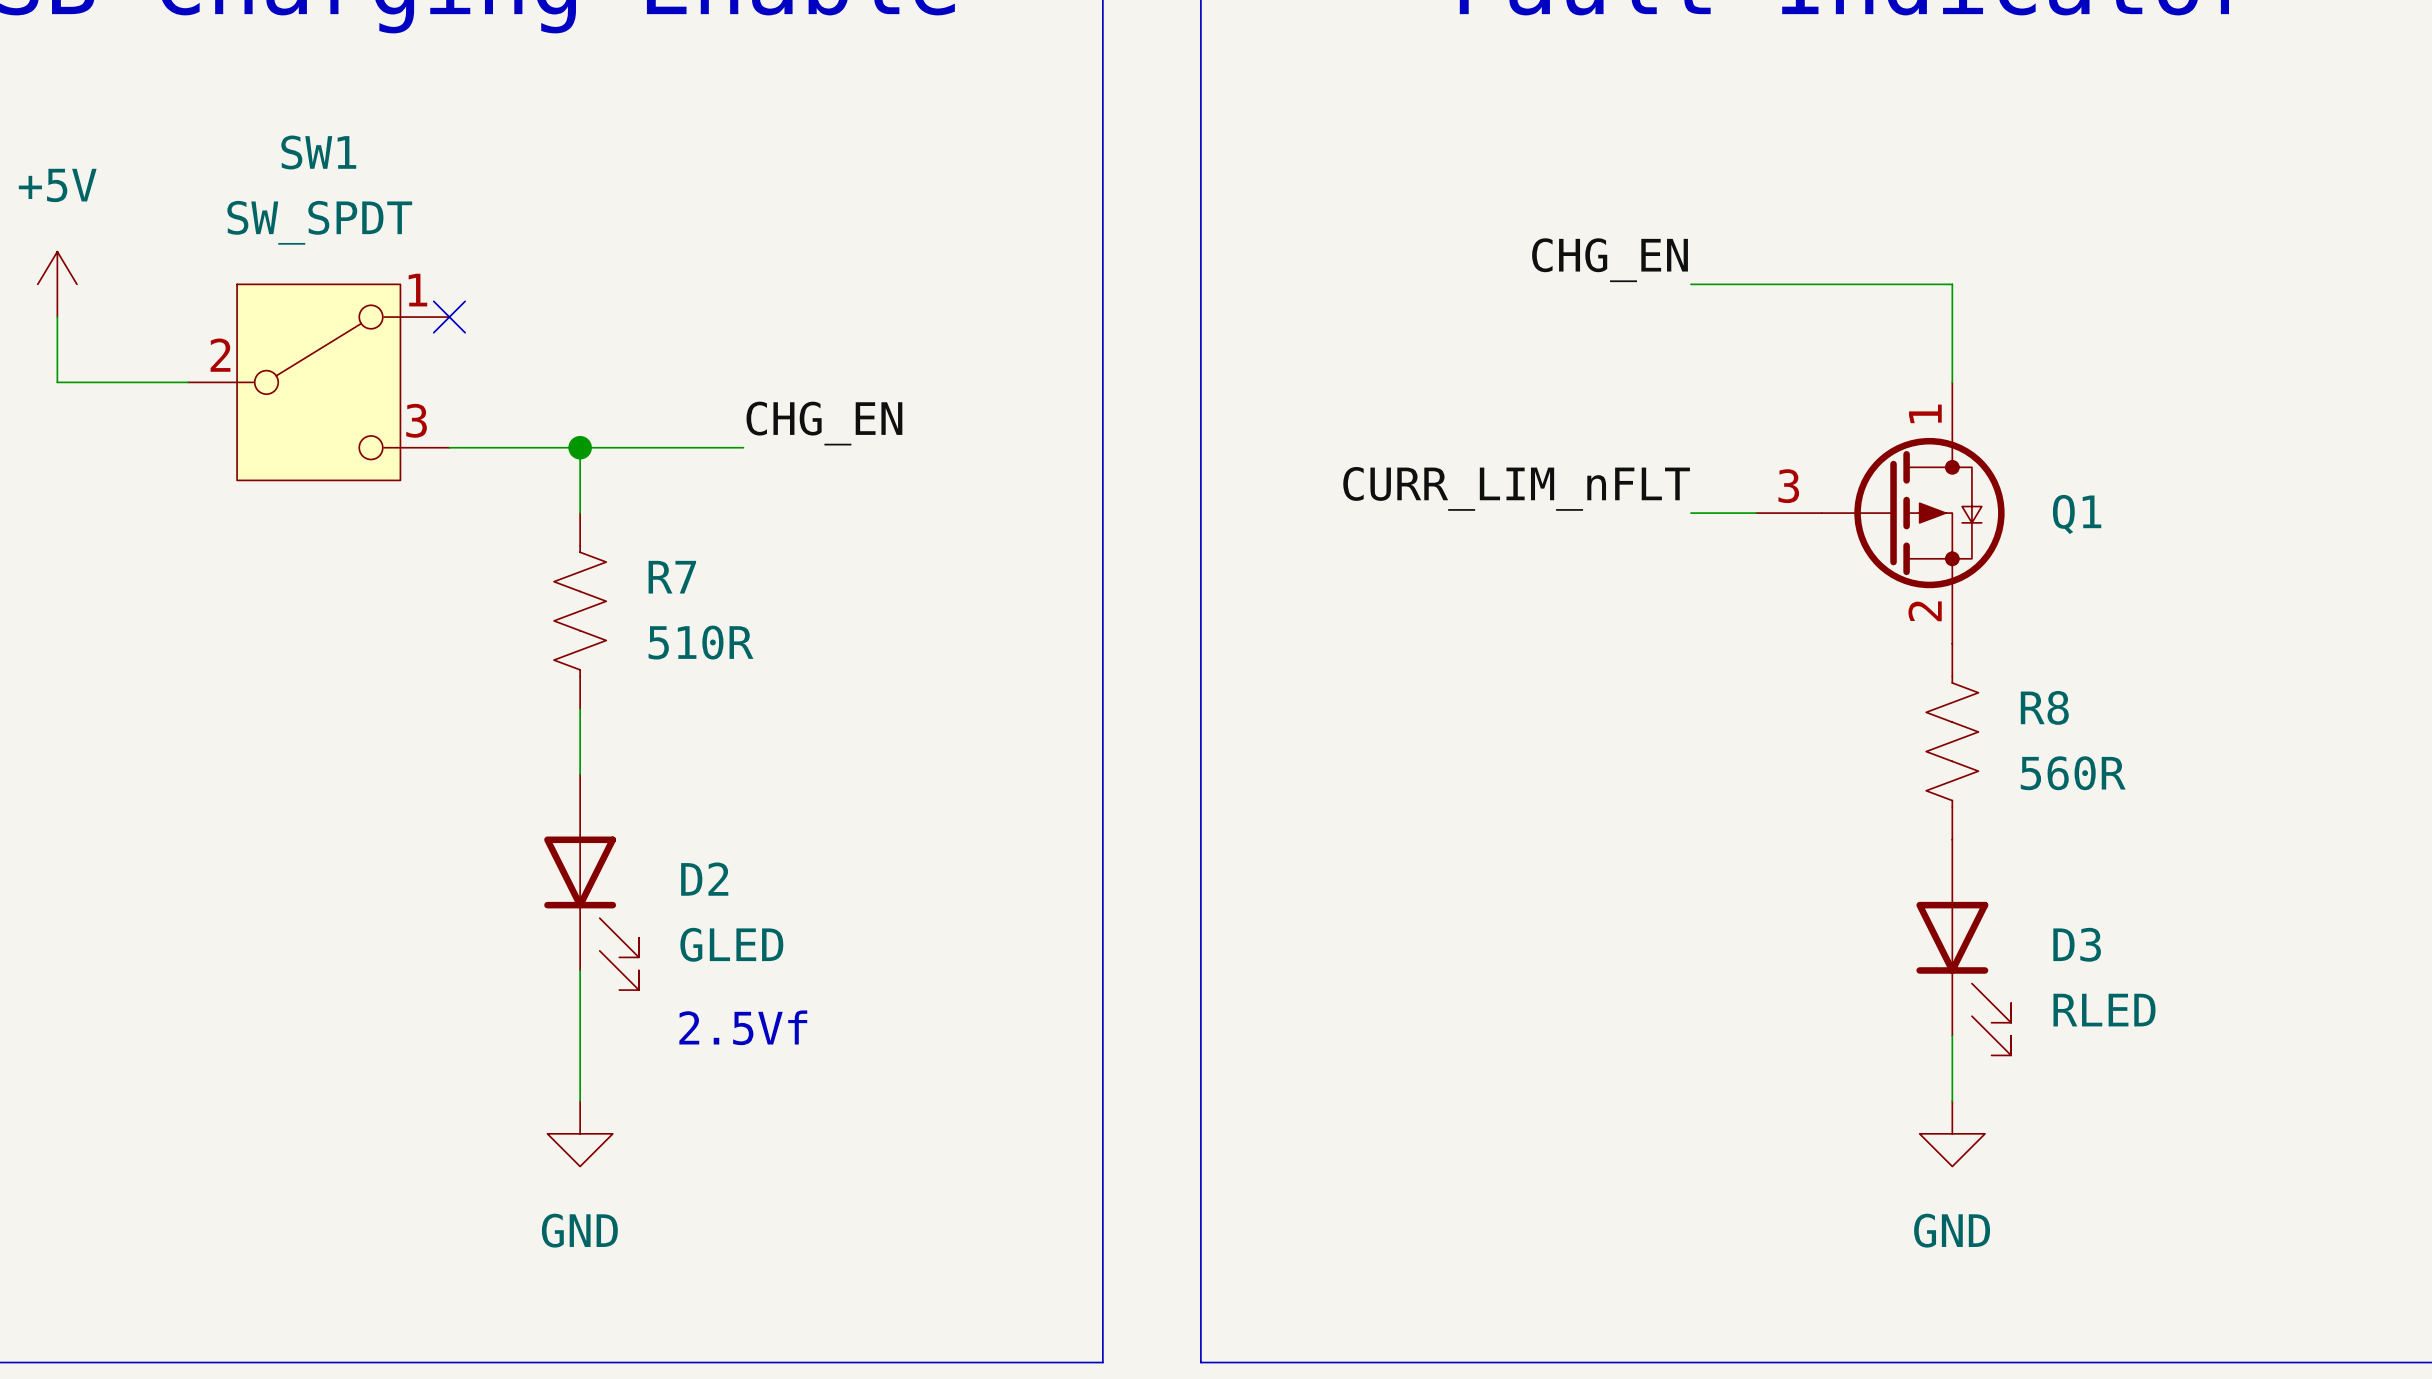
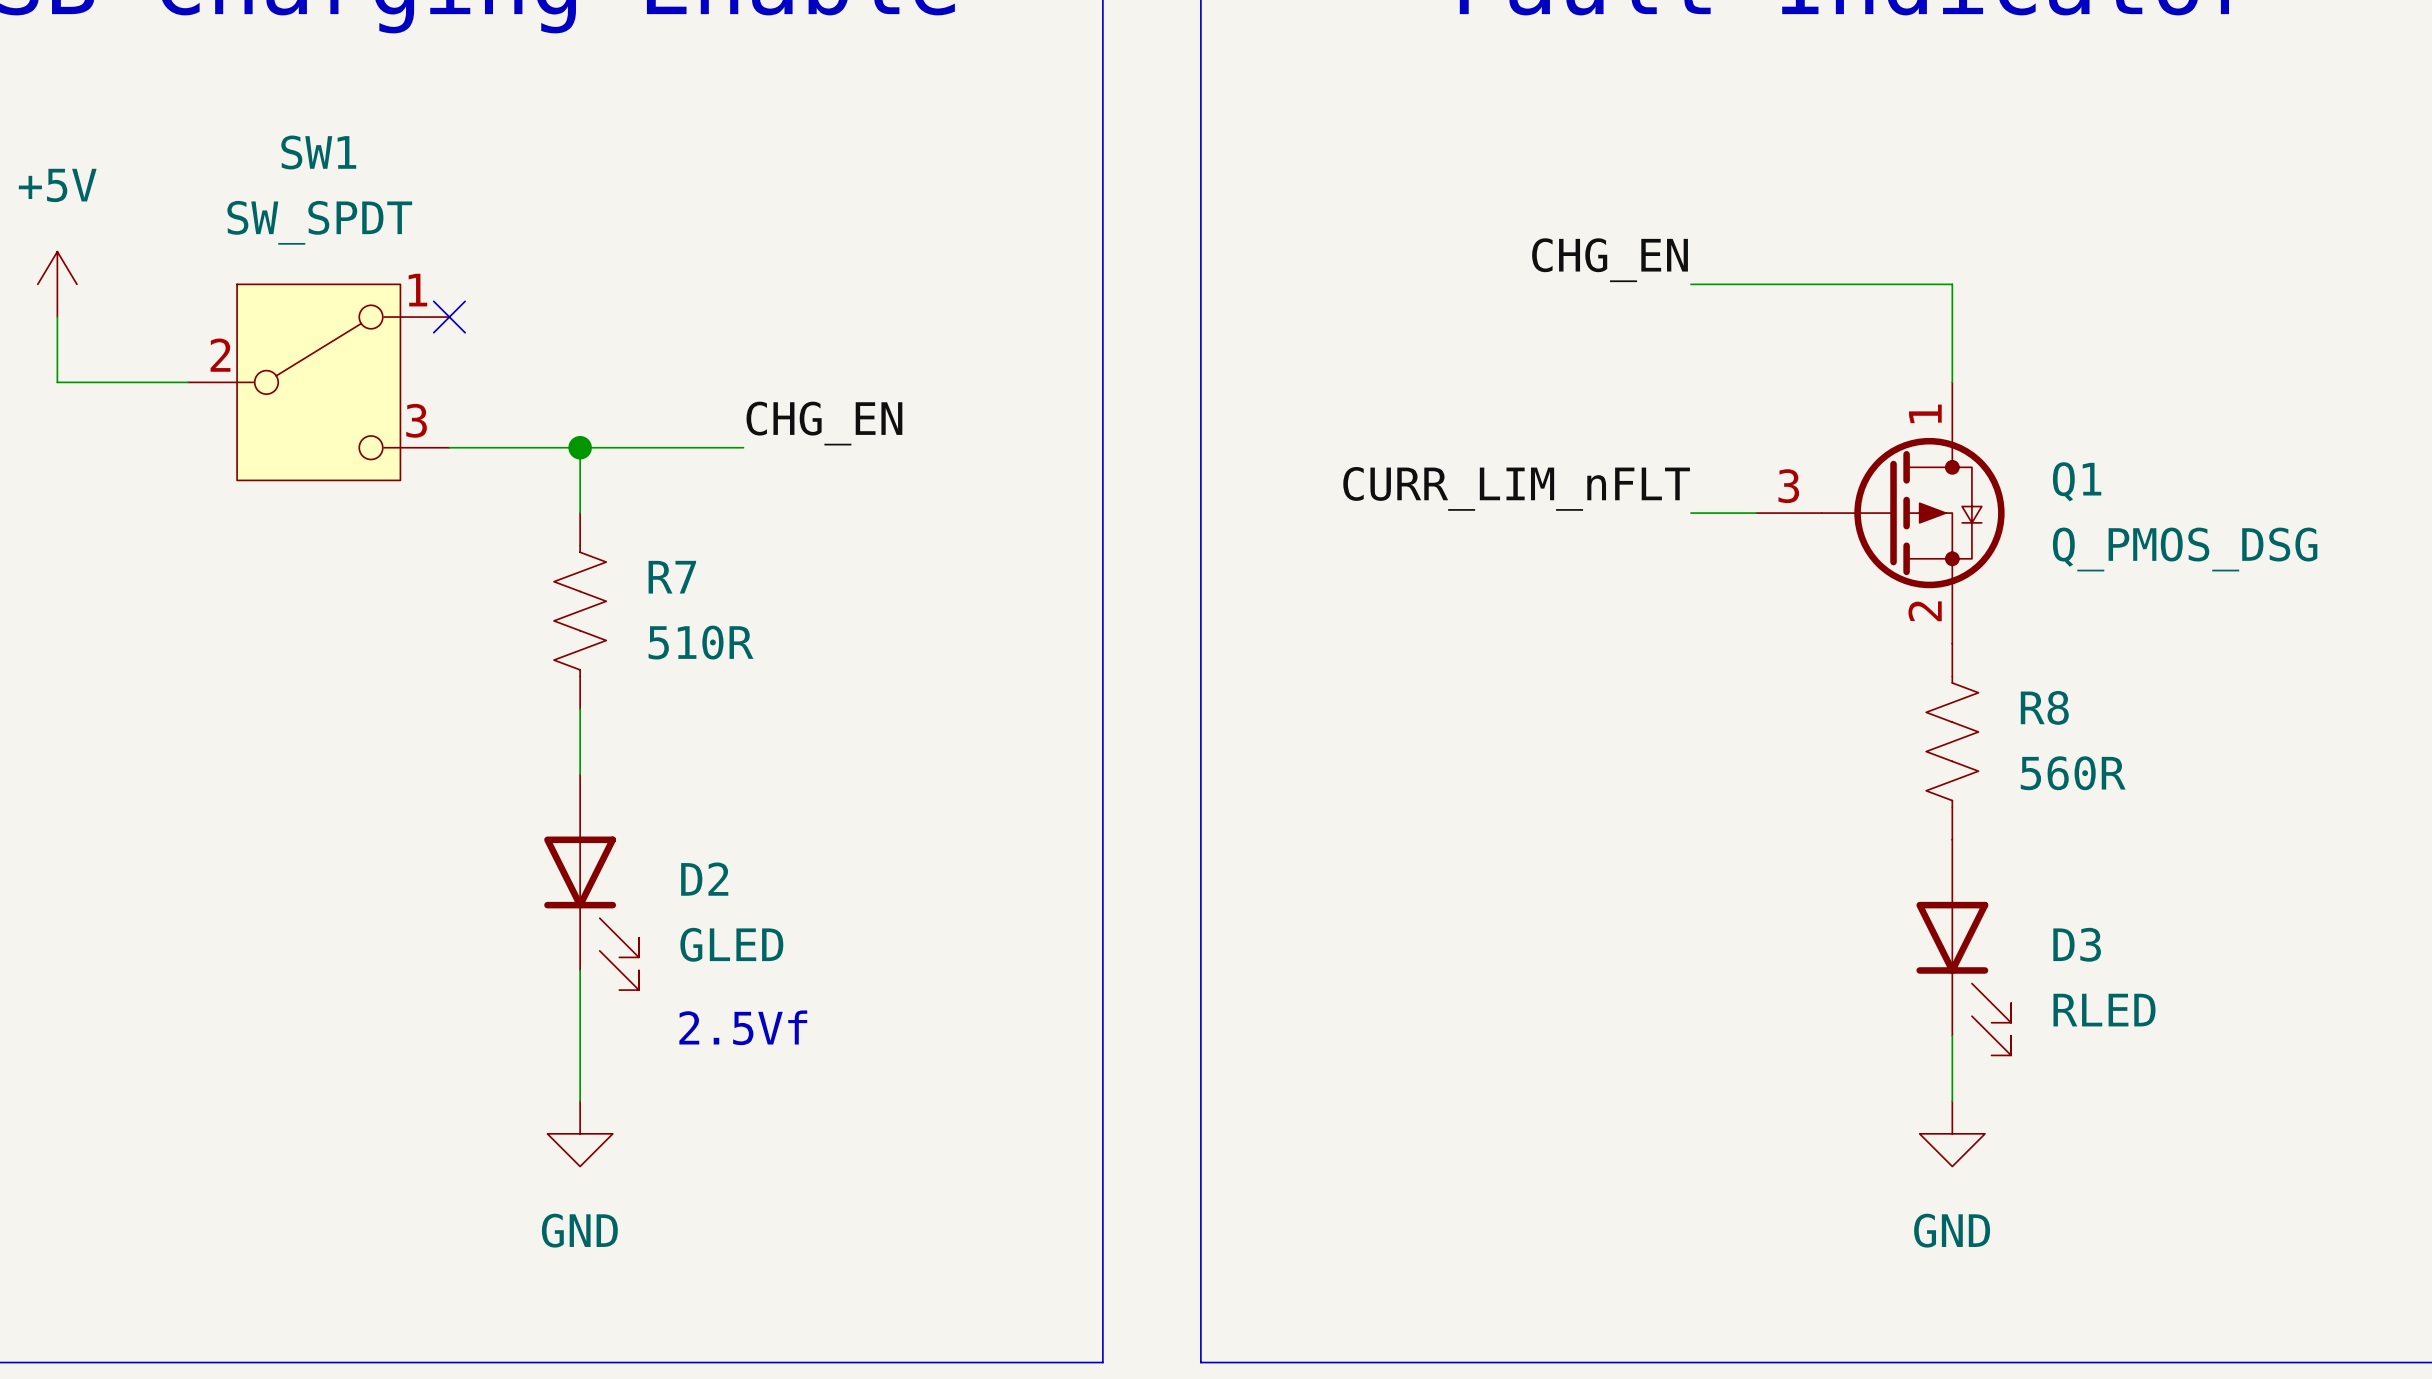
Q1 name position: Q1 (2077, 514) -> Q1 (2077, 481)
Q1 value: none -> Q_PMOS_DSG (2185, 549)

